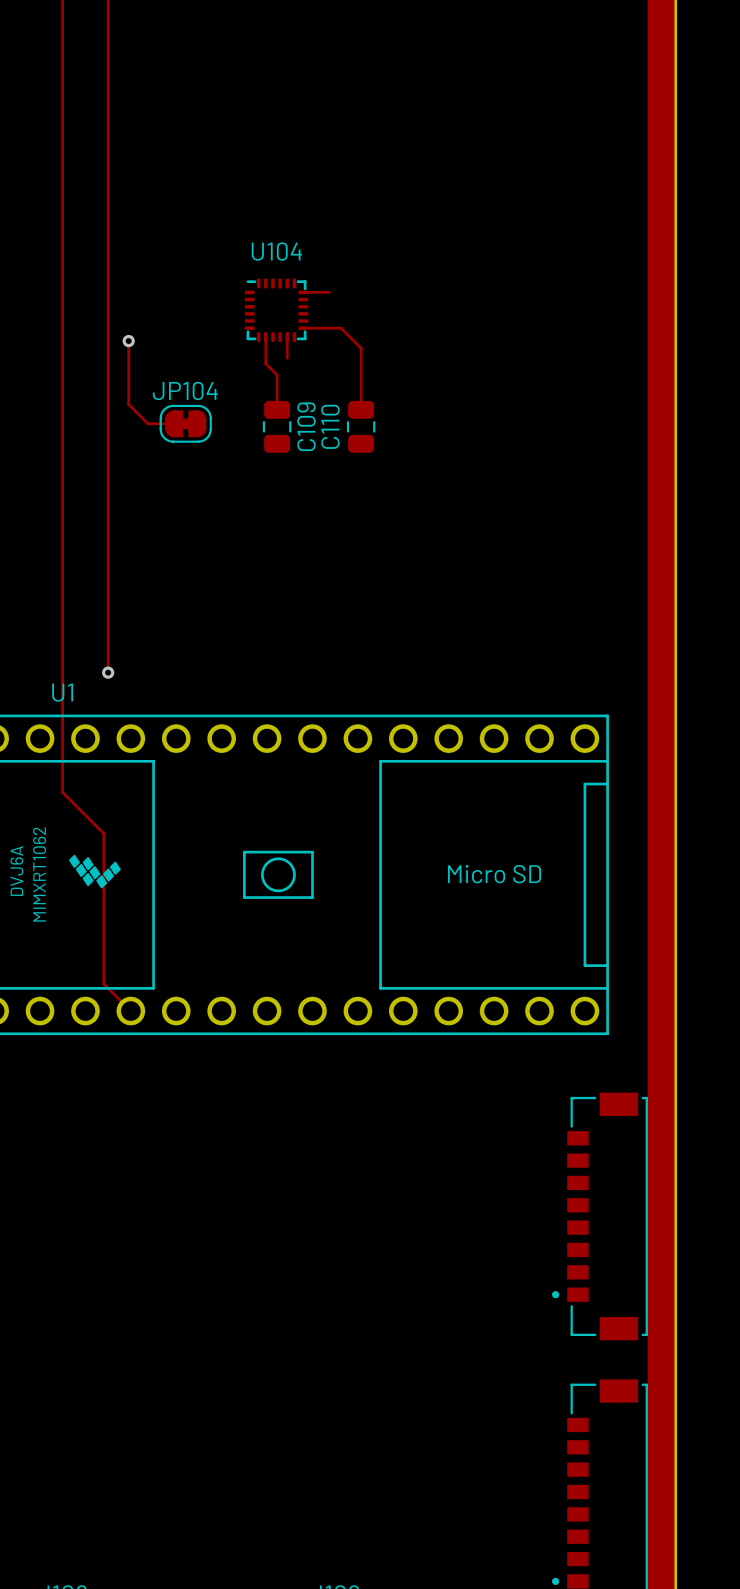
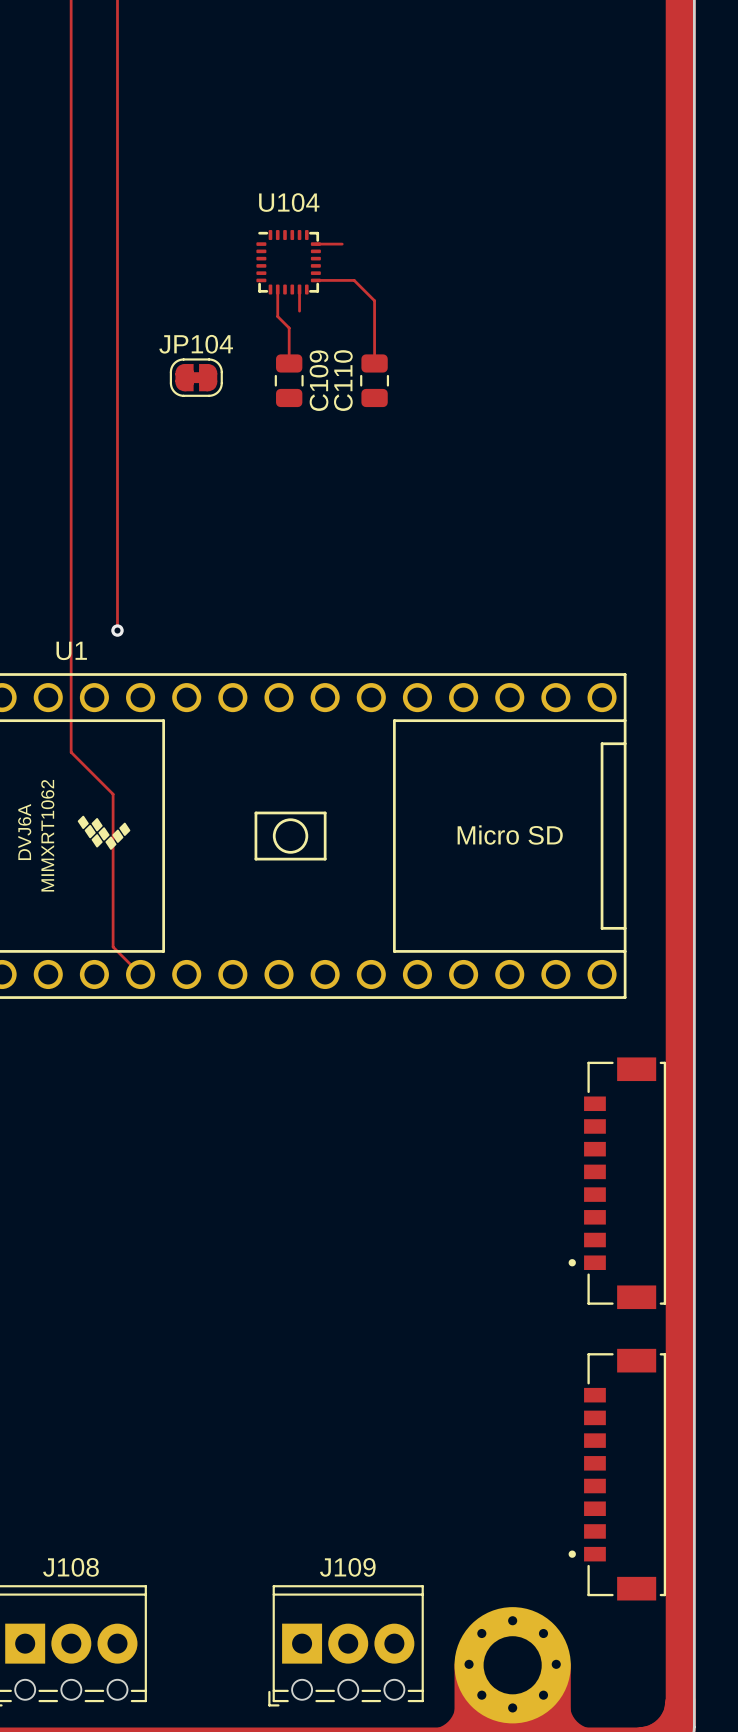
track: (128, 341) (128, 404) (148, 423) (174, 423) -> none
via: (128, 341) -> none

